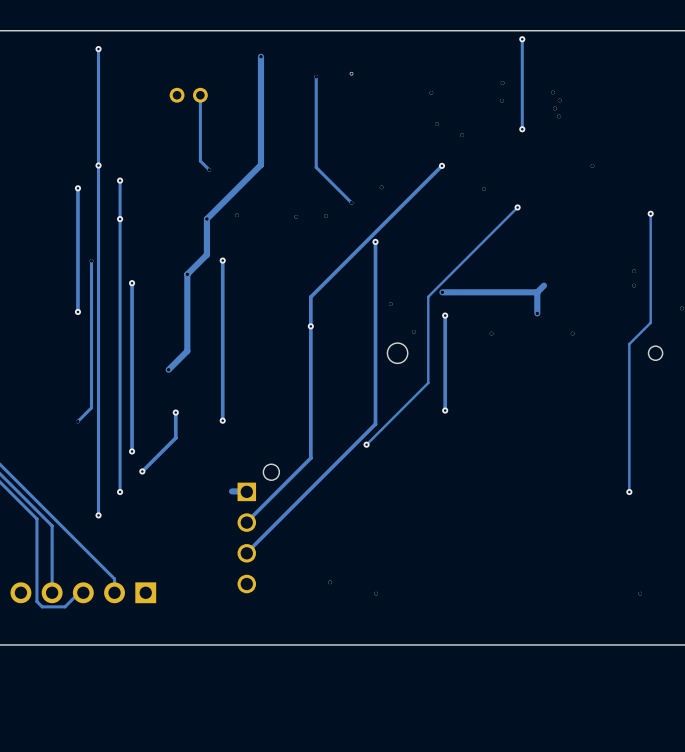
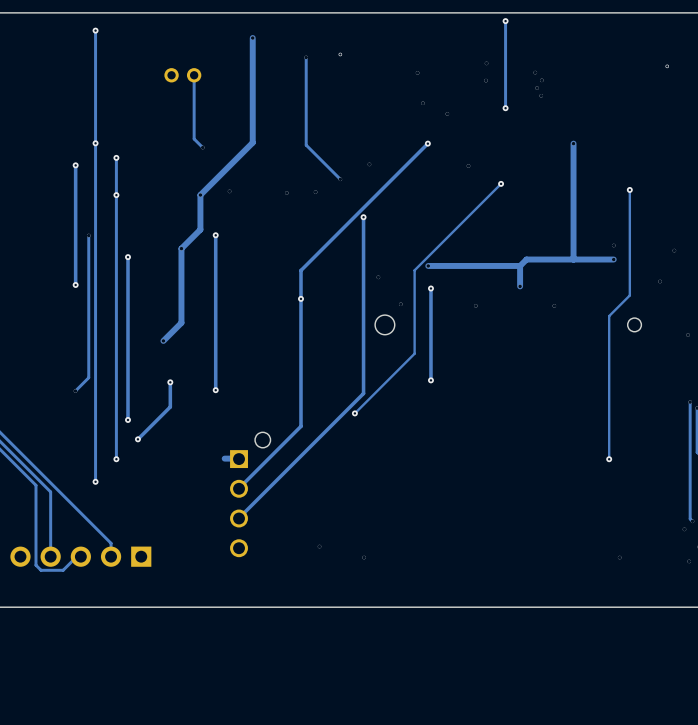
track: none -> (573, 143) (573, 259)
track: none -> (613, 259) (526, 259)

